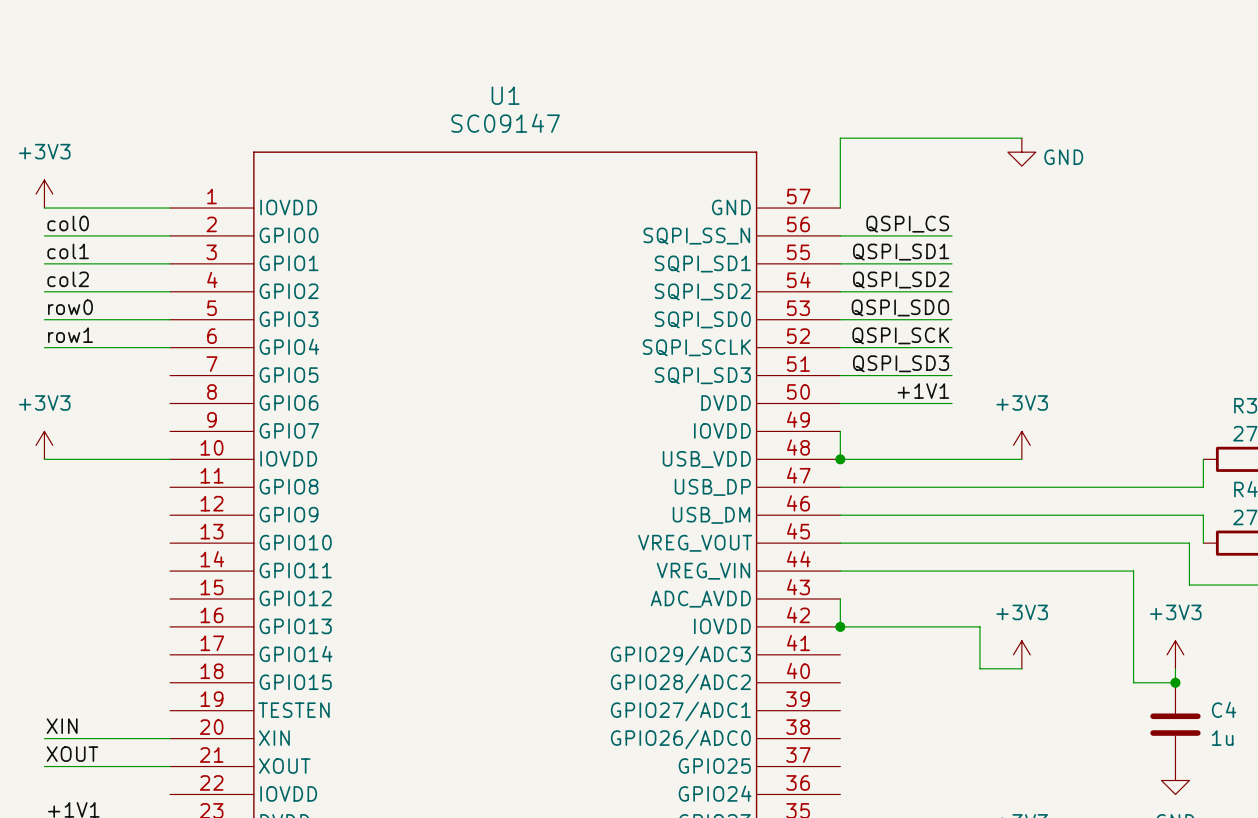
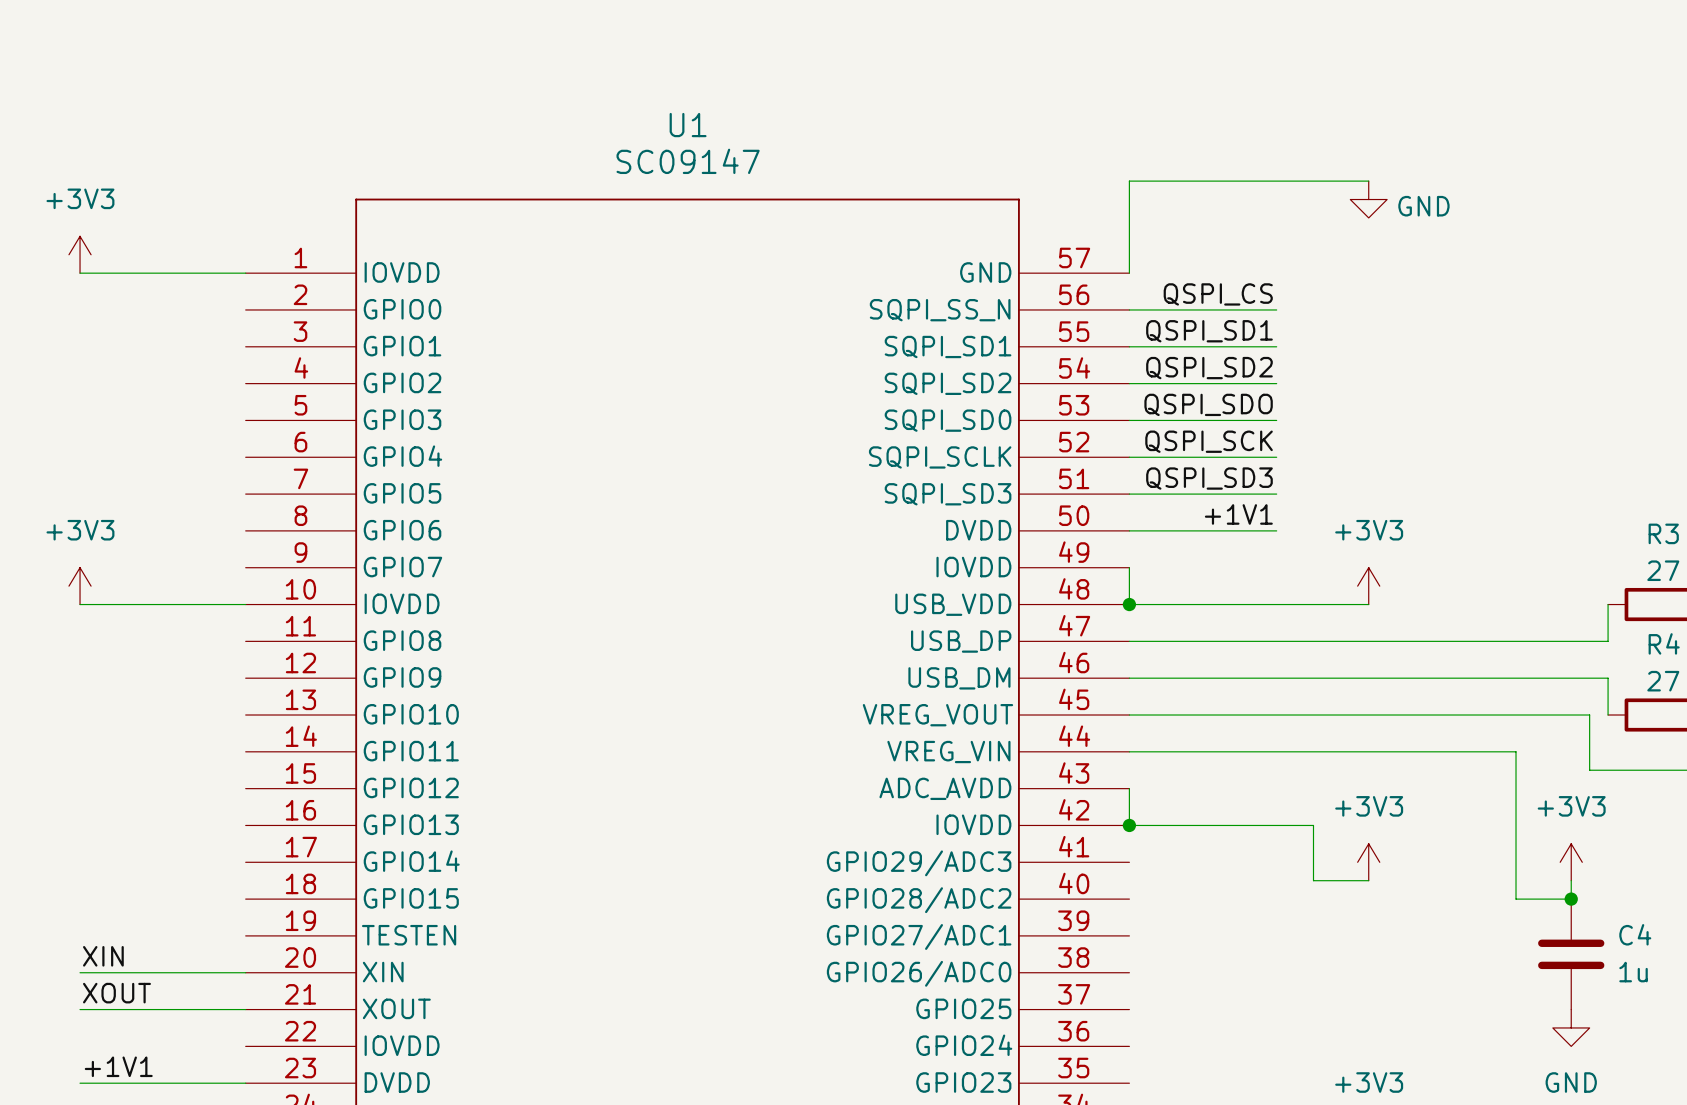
label: col0 (68, 223) -> none
wire: (44, 235) (170, 235) -> none
label: col1 (68, 251) -> none
wire: (44, 263) (170, 263) -> none
label: col2 (68, 279) -> none
wire: (44, 291) (170, 291) -> none
label: row0 (70, 307) -> none
wire: (44, 319) (170, 319) -> none
label: row1 (70, 335) -> none
wire: (44, 347) (170, 347) -> none

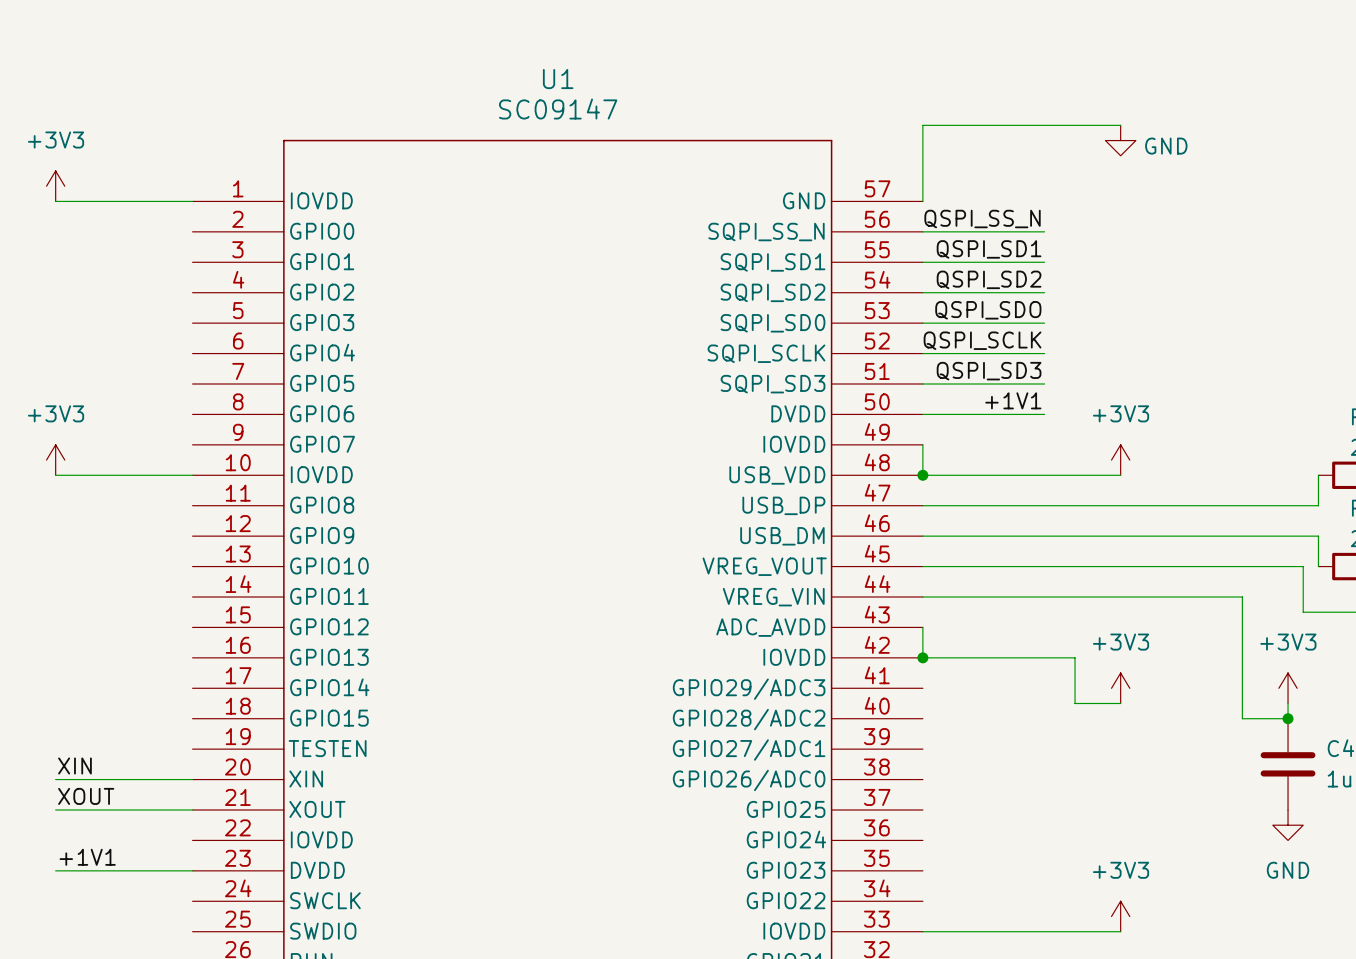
label: QSPI_CS (1218, 294) -> QSPI_SS_N (982, 219)
label: QSPI_SCK (1209, 441) -> QSPI_SCLK (982, 340)

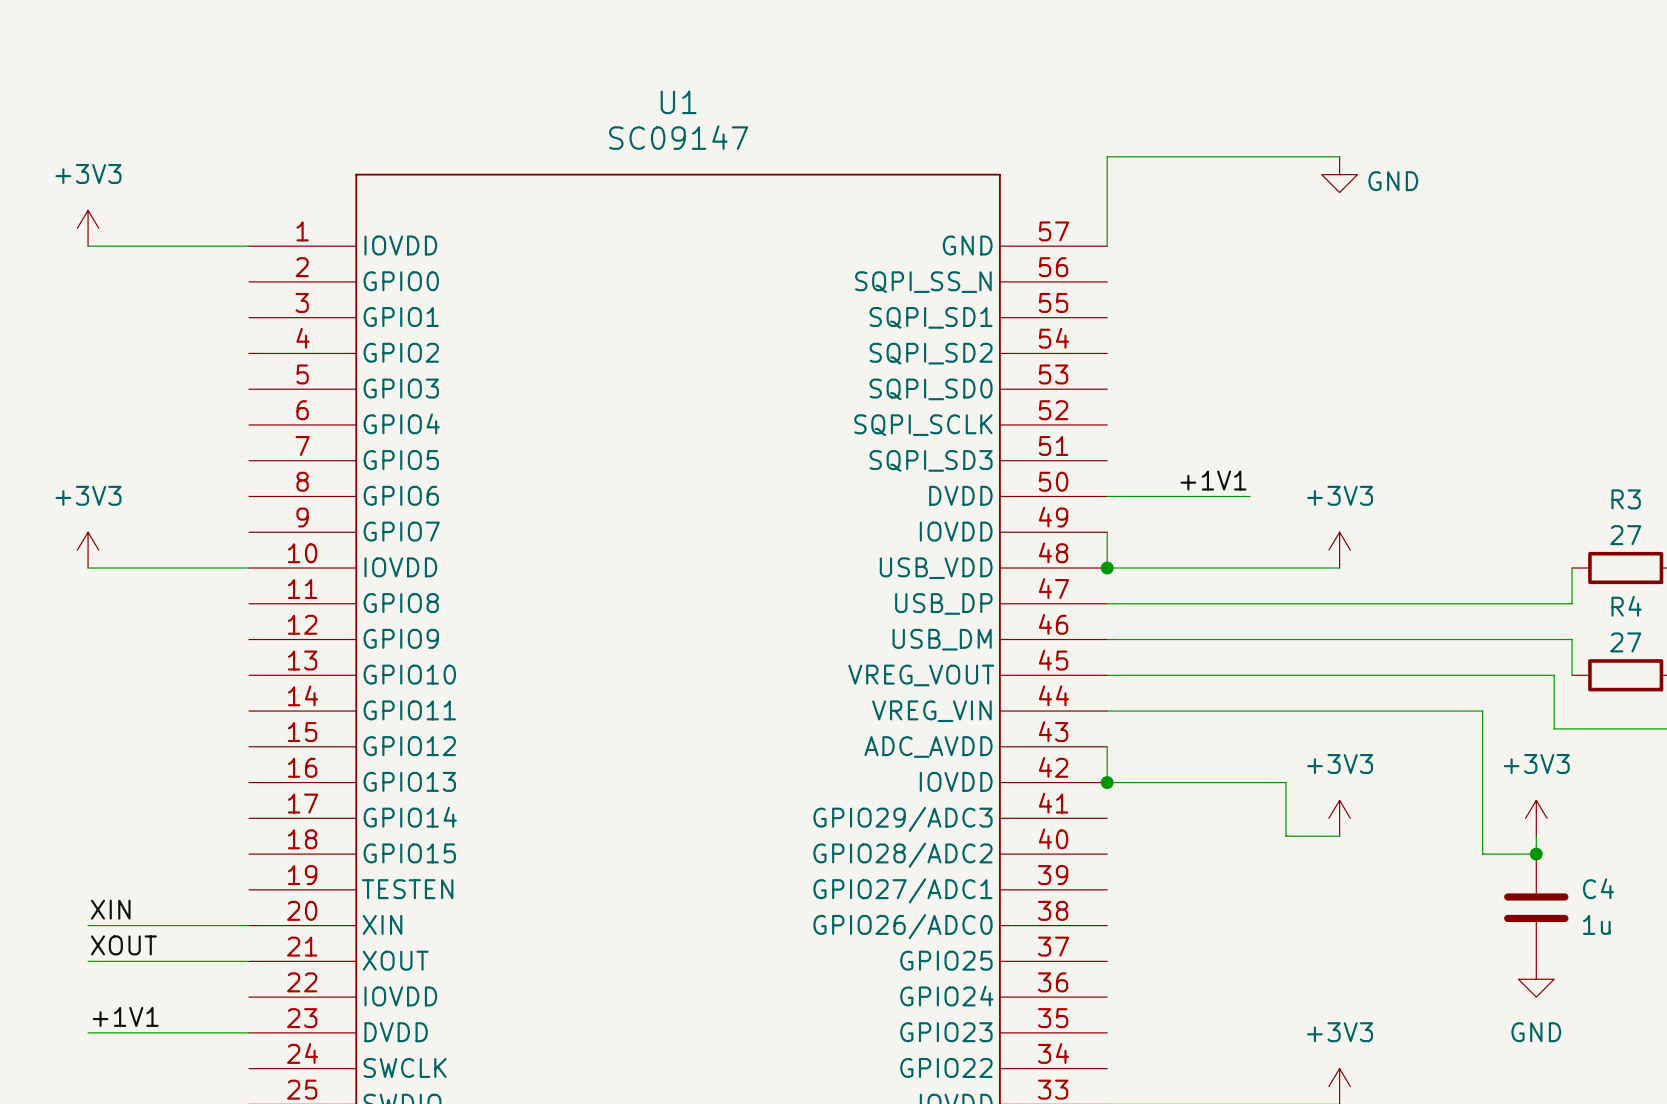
label: QSPI_SS_N (982, 219) -> none
wire: (922, 231) (1044, 231) -> none
label: QSPI_SD1 (989, 249) -> none
wire: (922, 262) (1044, 262) -> none
label: QSPI_SD2 (989, 279) -> none
wire: (922, 292) (1044, 292) -> none
label: QSPI_SDO (988, 310) -> none
wire: (922, 323) (1044, 323) -> none
label: QSPI_SCLK (982, 340) -> none
wire: (922, 353) (1044, 353) -> none
label: QSPI_SD3 (989, 371) -> none
wire: (922, 383) (1044, 383) -> none

